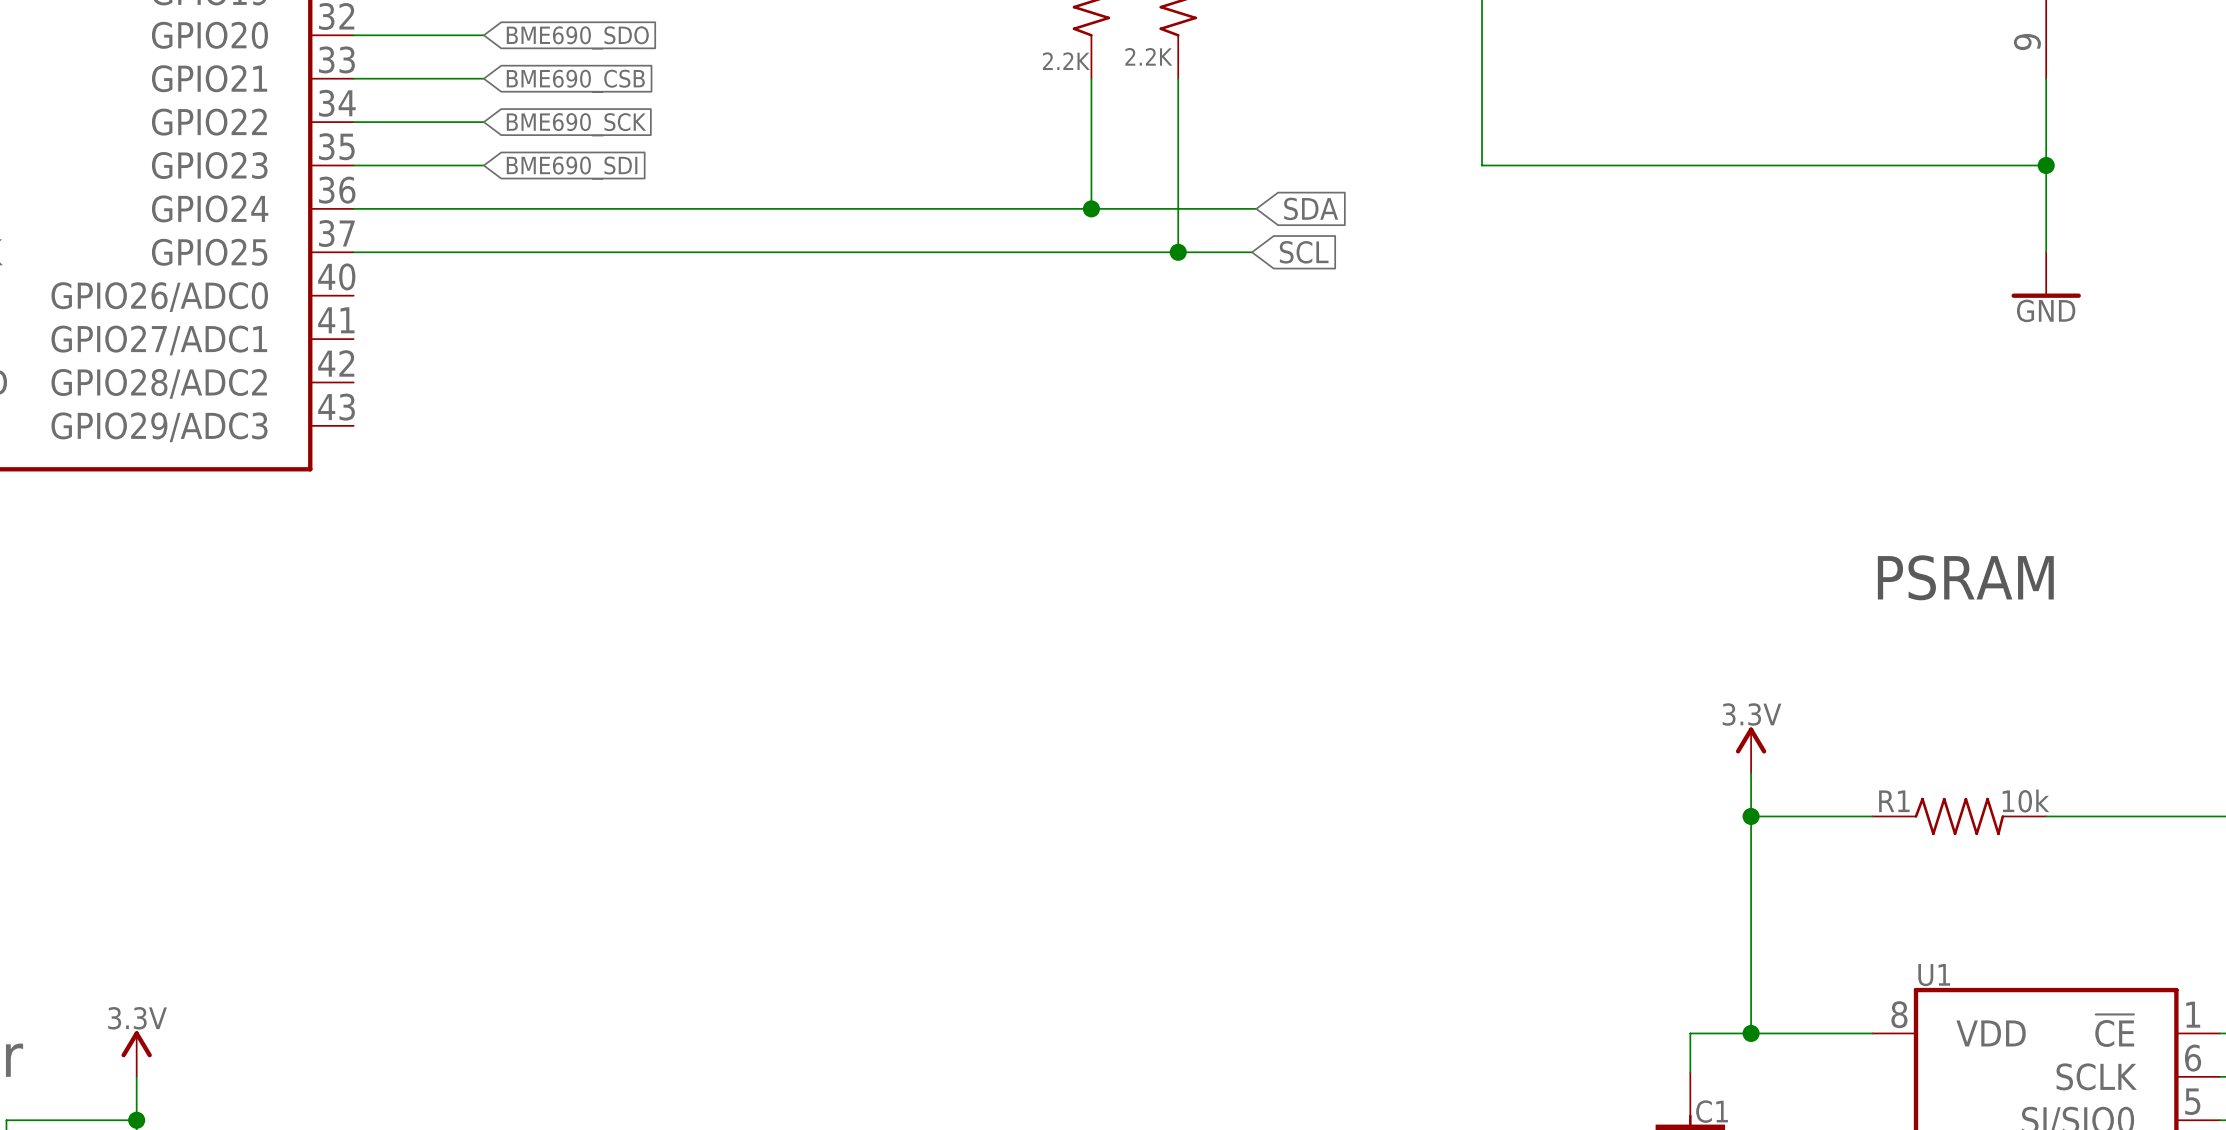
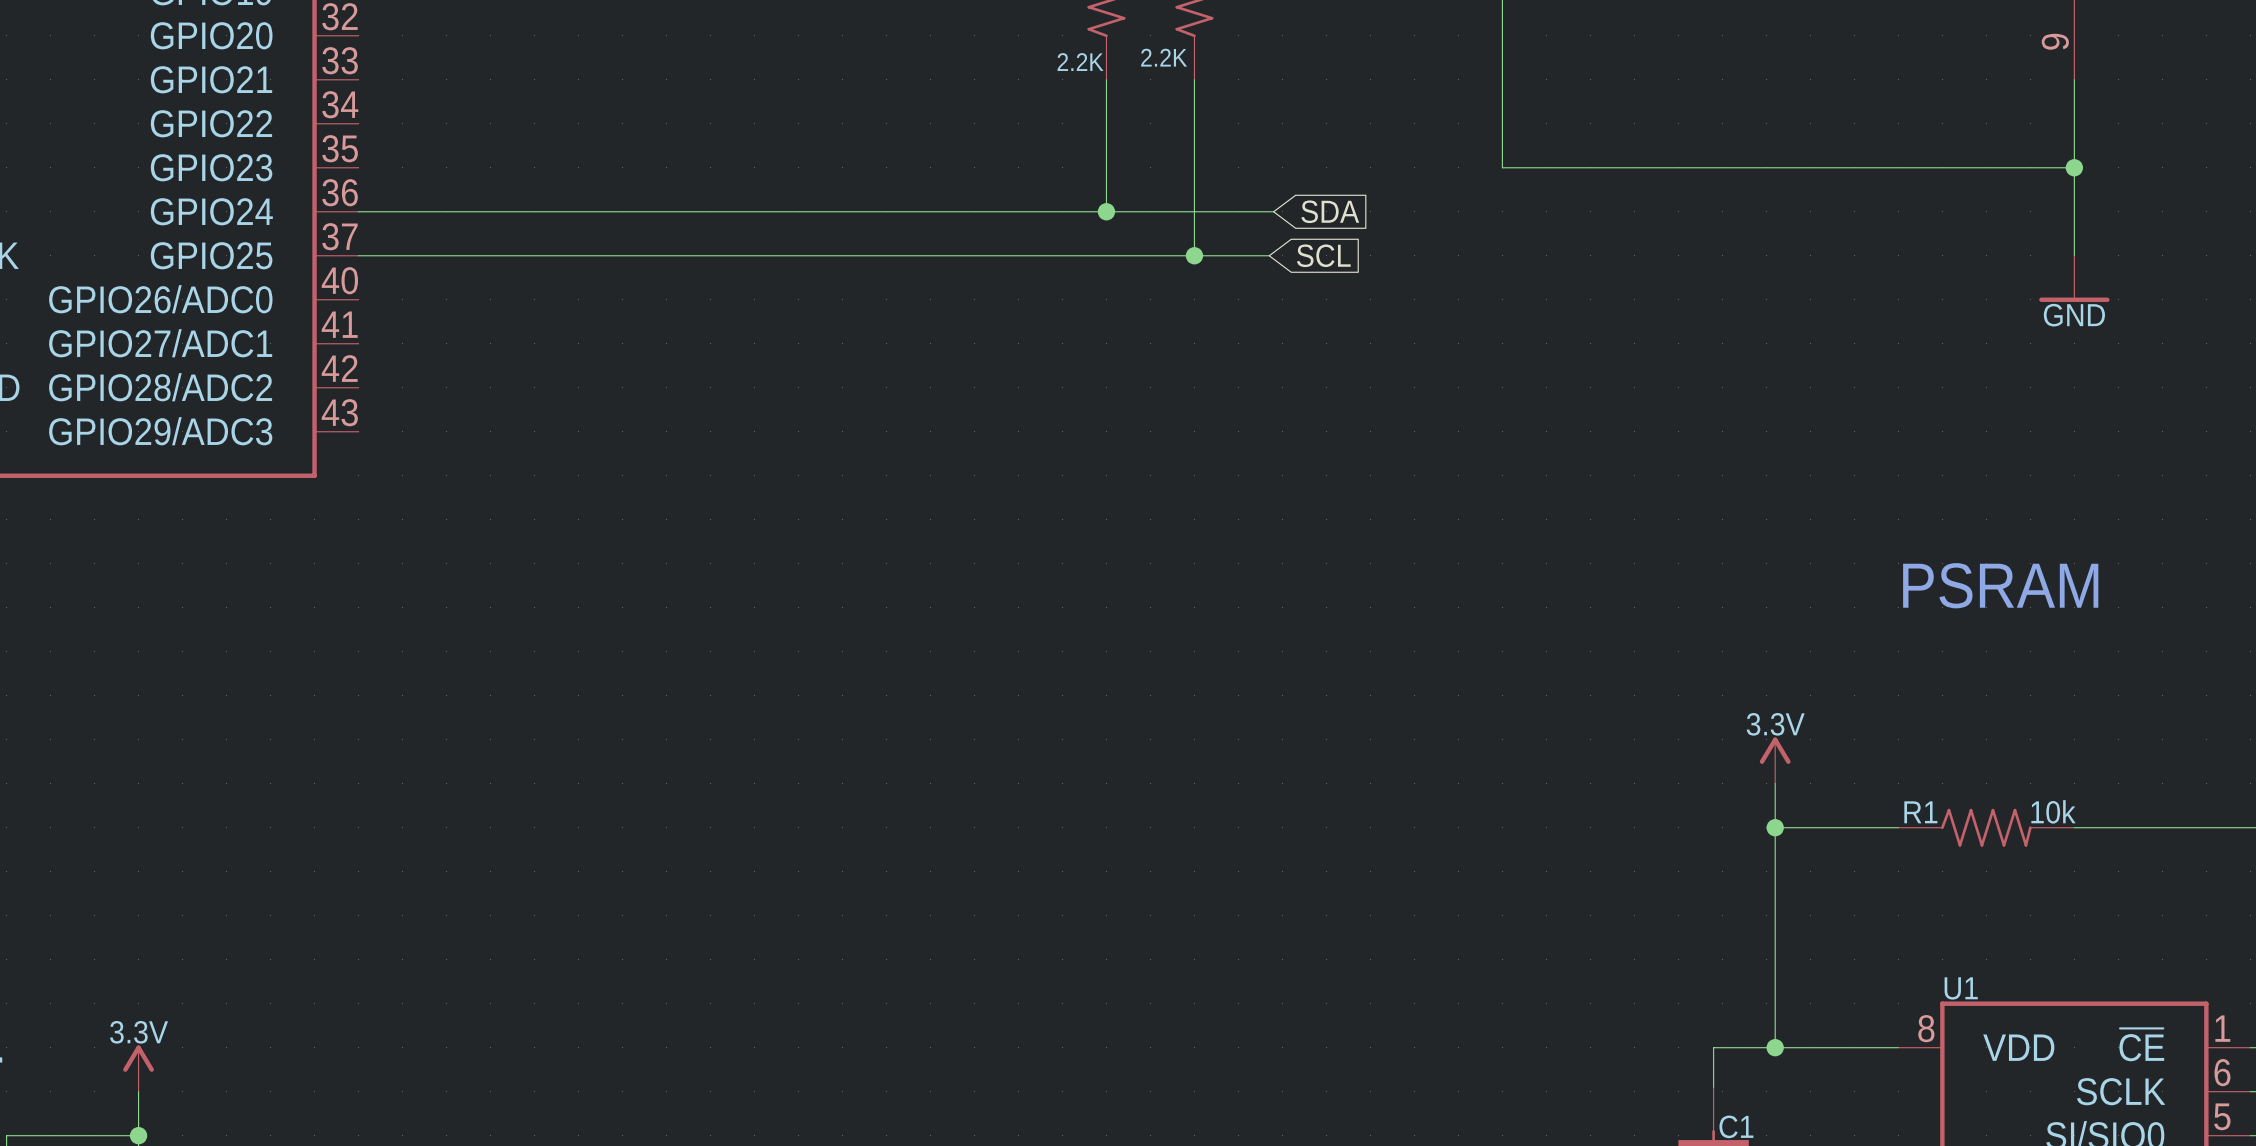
wire: (353, 35) (483, 35) -> none
global label: BME690_SDO (577, 37) -> none
wire: (353, 78) (483, 78) -> none
global label: BME690_CSB (575, 81) -> none
wire: (353, 122) (483, 122) -> none
global label: BME690_SCK (576, 124) -> none
wire: (353, 165) (483, 165) -> none
global label: BME690_SDI (572, 168) -> none

